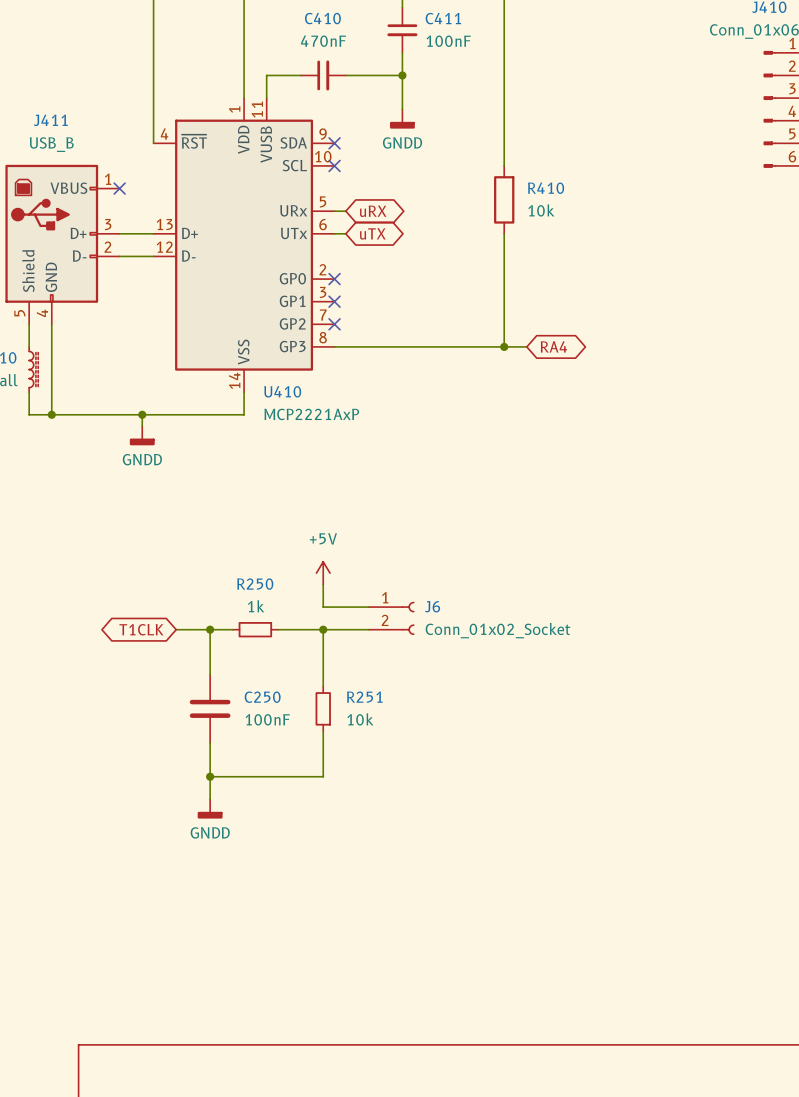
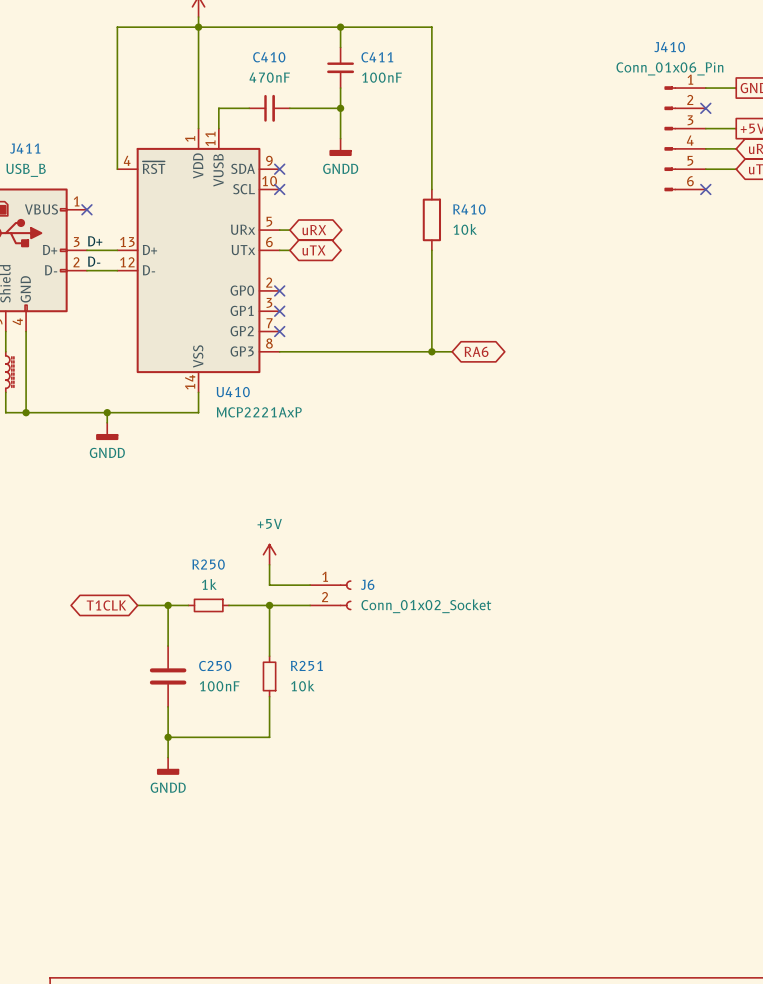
label: none -> D+ (95, 241)
label: none -> D- (94, 261)
global label: RA4 (553, 346) -> RA6 (476, 351)

